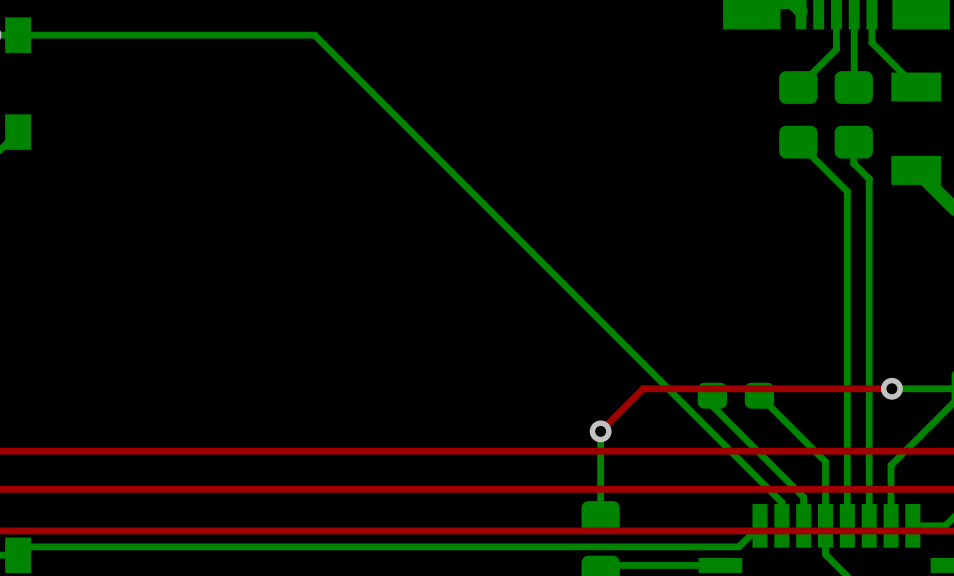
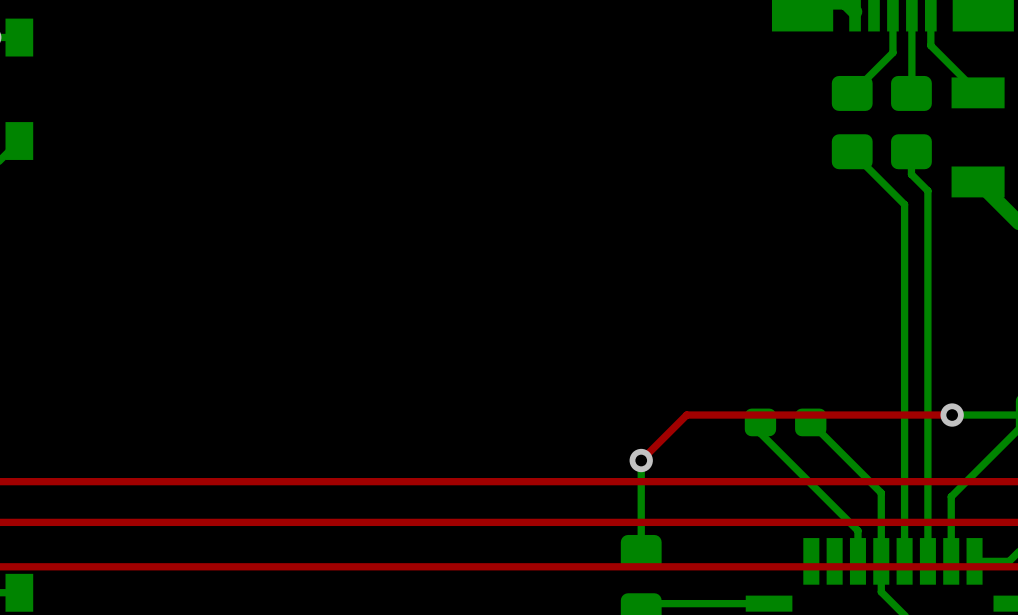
bottom track: (18, 35) (314, 35) (781, 502) (781, 525) -> none
bottom track: (759, 525) (738, 546) (26, 546) (18, 555) -> none

